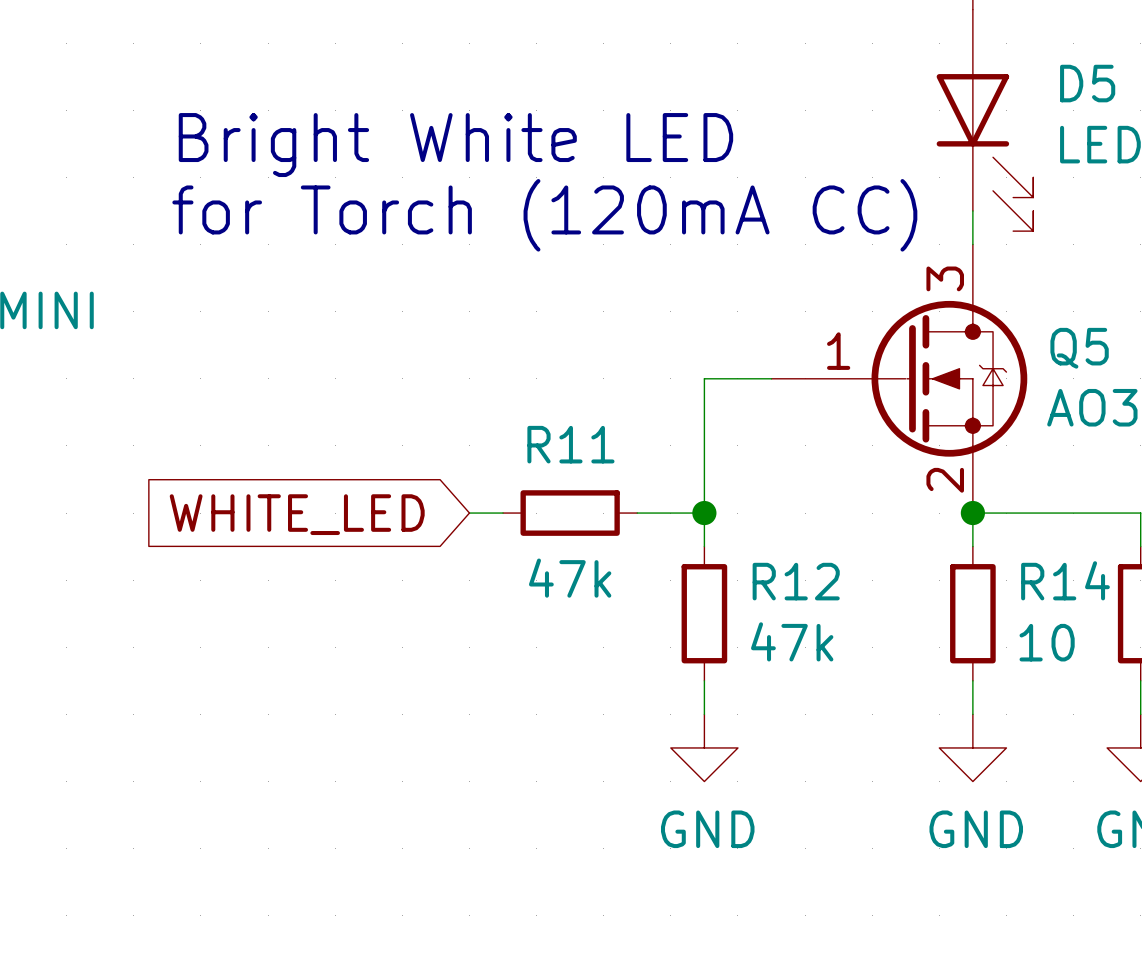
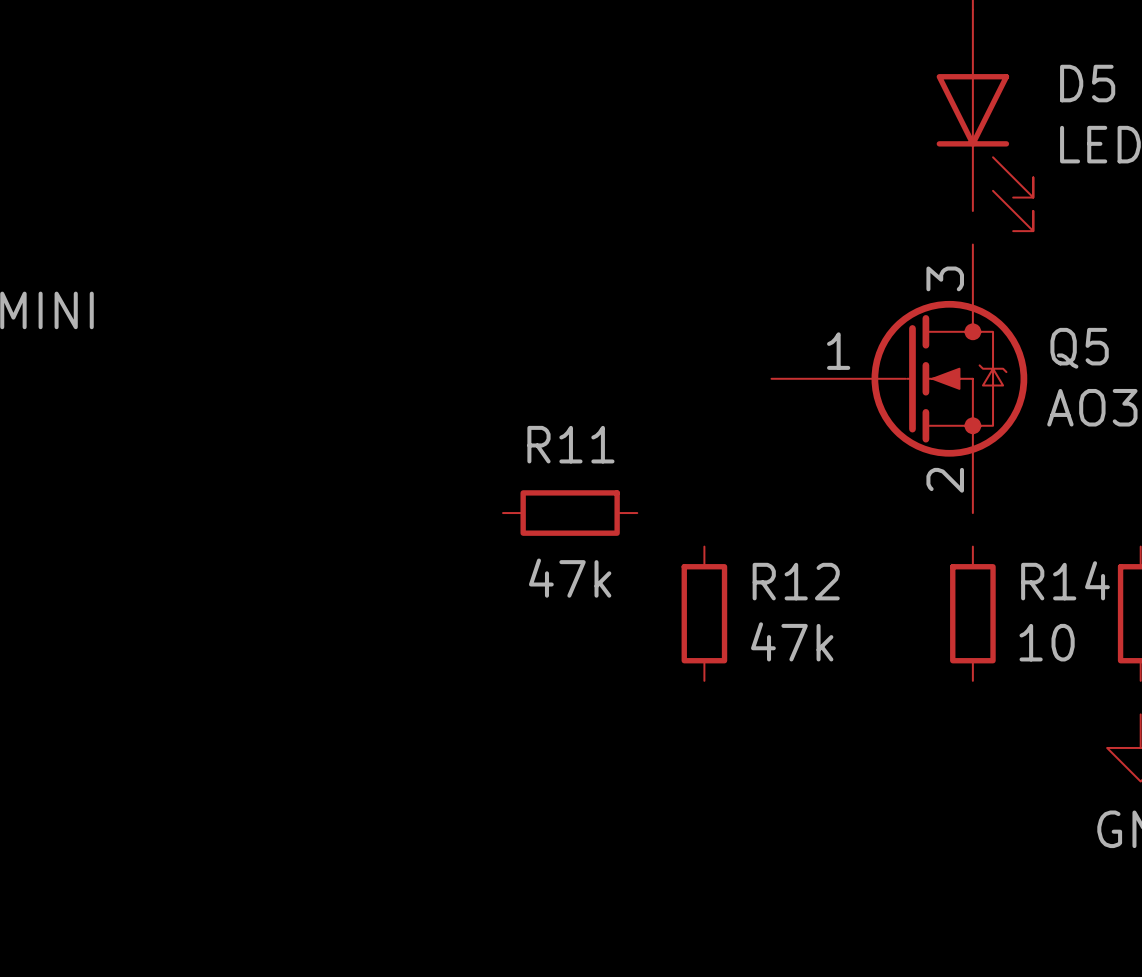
text: Bright White LED (455, 145) -> none
wire: (972, 210) (972, 244) -> none
text: for Torch (120mA CC) (544, 215) -> none
wire: (771, 378) (704, 378) (704, 546) -> none
wire: (469, 513) (503, 513) -> none
wire: (637, 513) (704, 513) -> none
junction: (704, 513) -> none
junction: (972, 513) -> none
global label: WHITE_LED (297, 514) -> none
wire: (972, 546) (972, 513) (1140, 513) (1140, 546) -> none
wire: (704, 680) (704, 714) -> none
wire: (972, 680) (972, 714) -> none
wire: (1140, 680) (1140, 714) -> none
power symbol: GND (704, 747) -> none
power symbol: GND (972, 747) -> none

